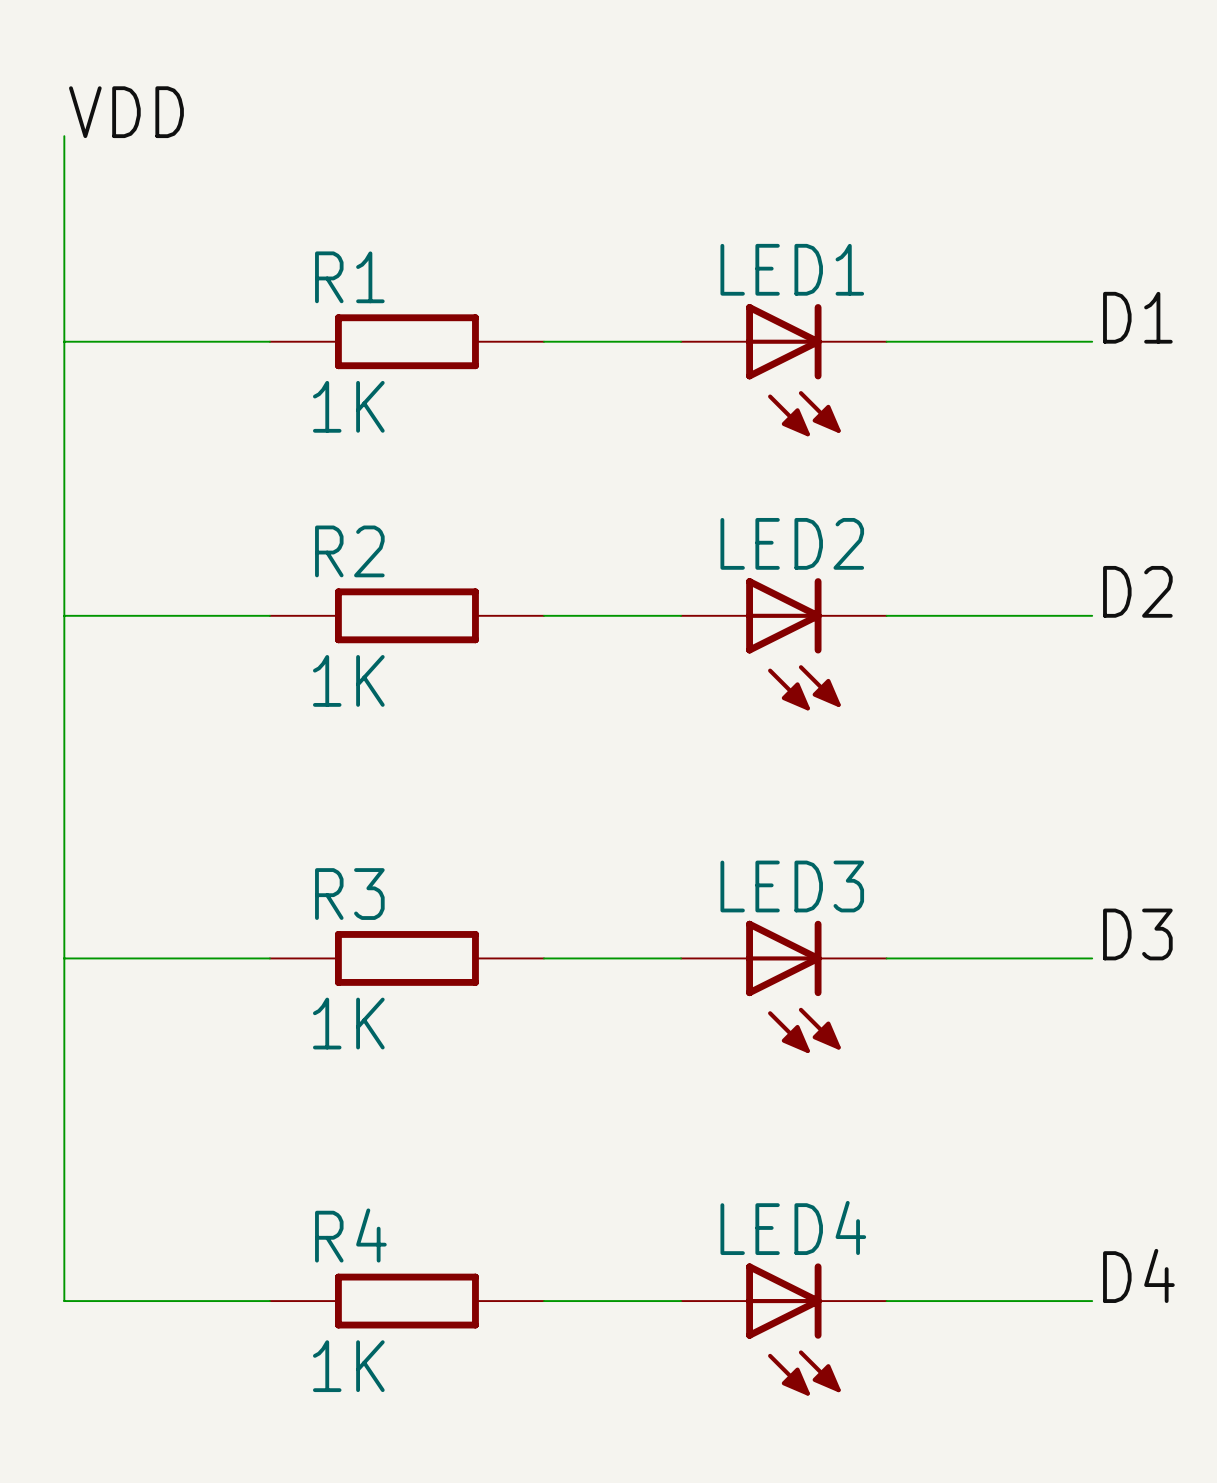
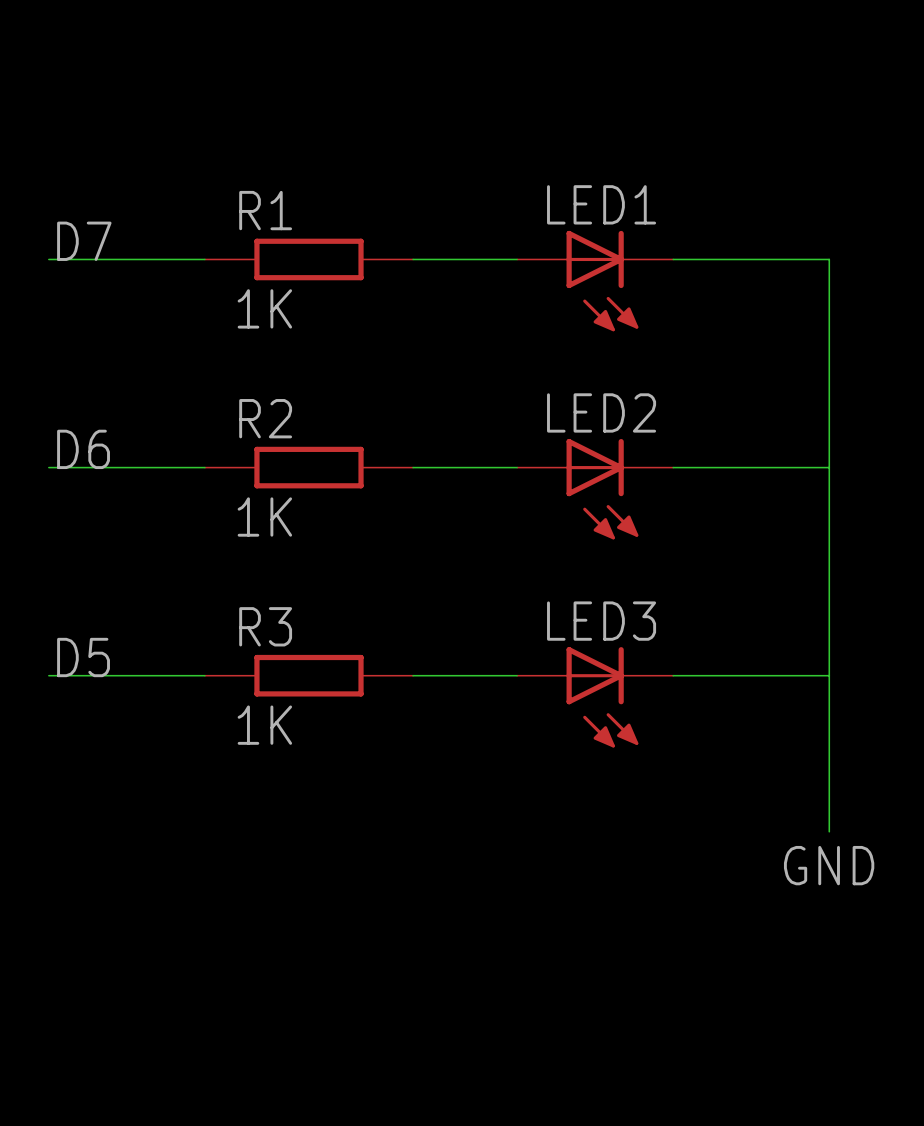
label: VDD (126, 112) -> none
wire: (64, 136) (64, 1301) (269, 1301) -> none
label: none -> D7 (84, 241)
label: D1 (1137, 317) -> none
wire: none -> (829, 259) (829, 831)
label: none -> D6 (83, 449)
label: D2 (1137, 591) -> none
label: none -> D5 (83, 657)
label: D3 (1137, 934) -> none
wire: (64, 958) (269, 958) -> (48, 675) (204, 675)
R3 position: (406, 958) -> (308, 675)
wire: (543, 958) (681, 958) -> (413, 675) (517, 675)
wire: (886, 958) (1092, 958) -> (673, 675) (829, 675)
LED3 position: (783, 986) -> (595, 697)
label: none -> GND (829, 865)
label: D4 (1138, 1275) -> none
R4: 1K (406, 1301) -> none
wire: (543, 1301) (681, 1301) -> none
wire: (886, 1301) (1092, 1301) -> none
LED4: (783, 1329) -> none

